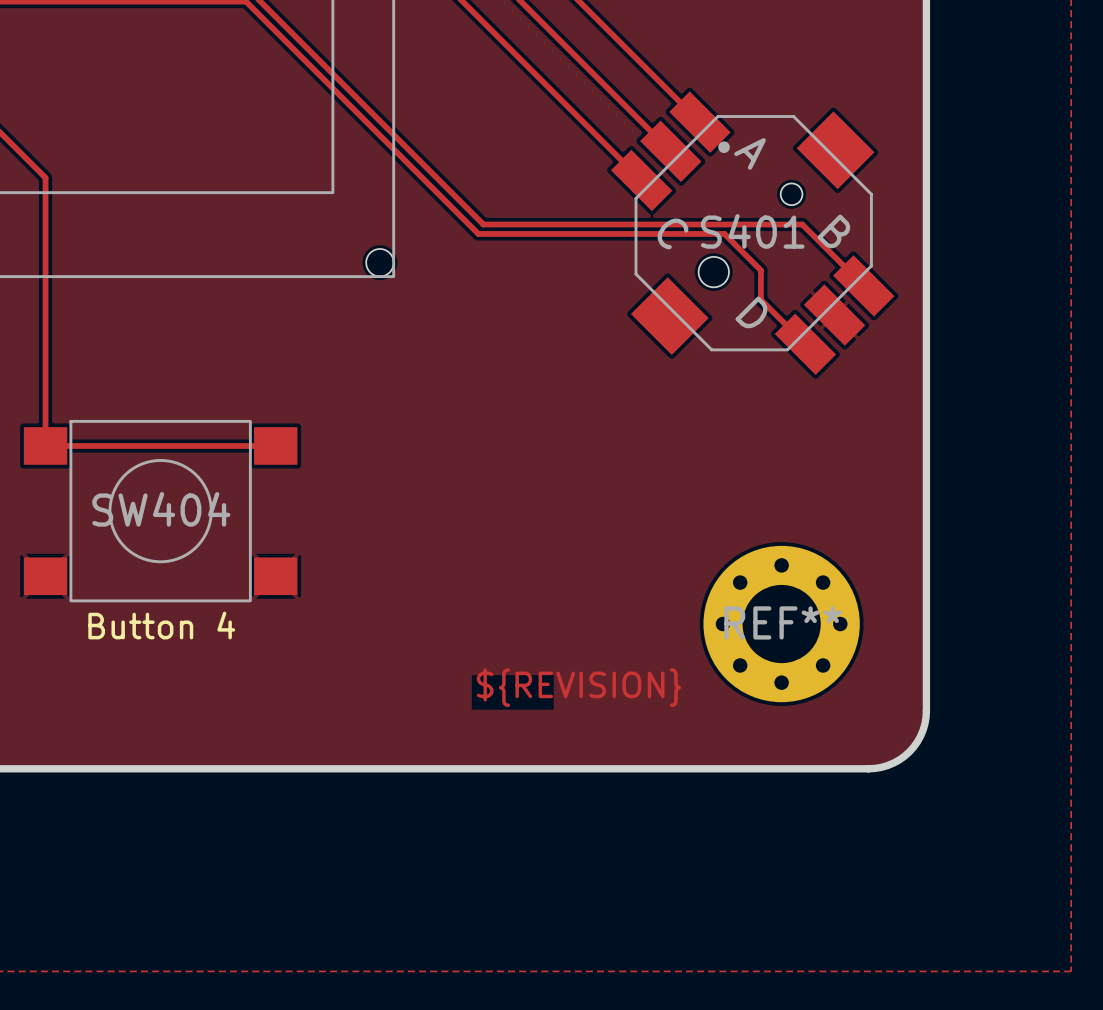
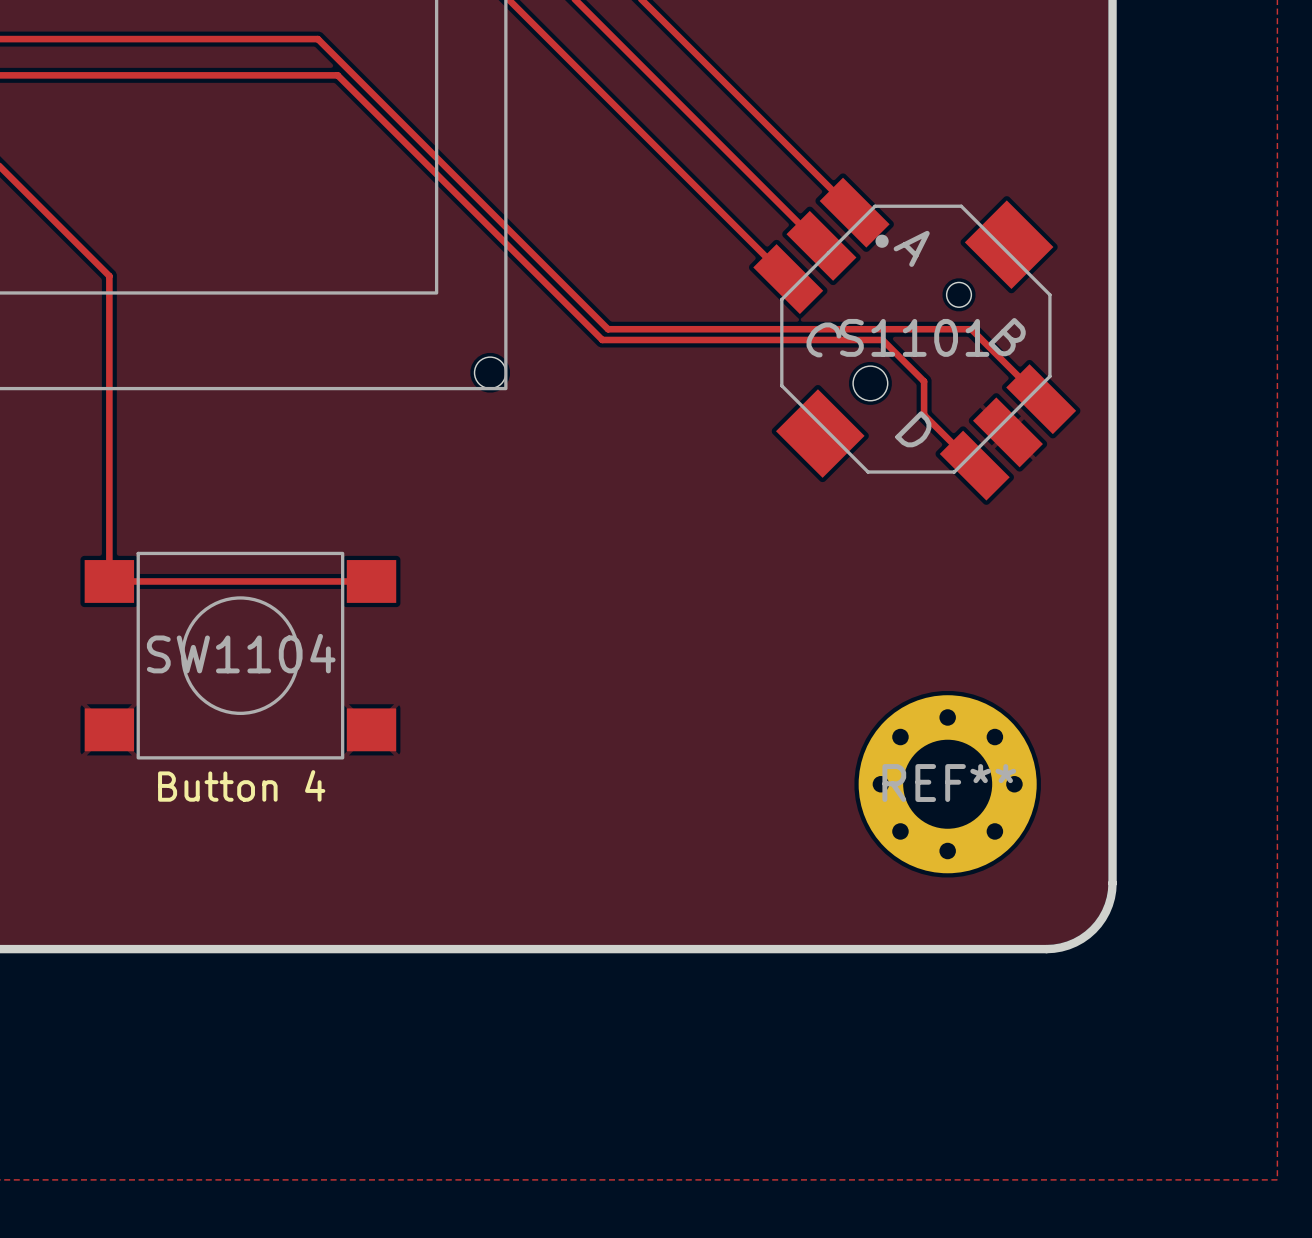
S401 name: S401 (752, 231) -> S1101 (914, 337)
SW404 name: SW404 (161, 509) -> SW1104 (241, 653)
text: ${REVISION} (578, 687) -> none

